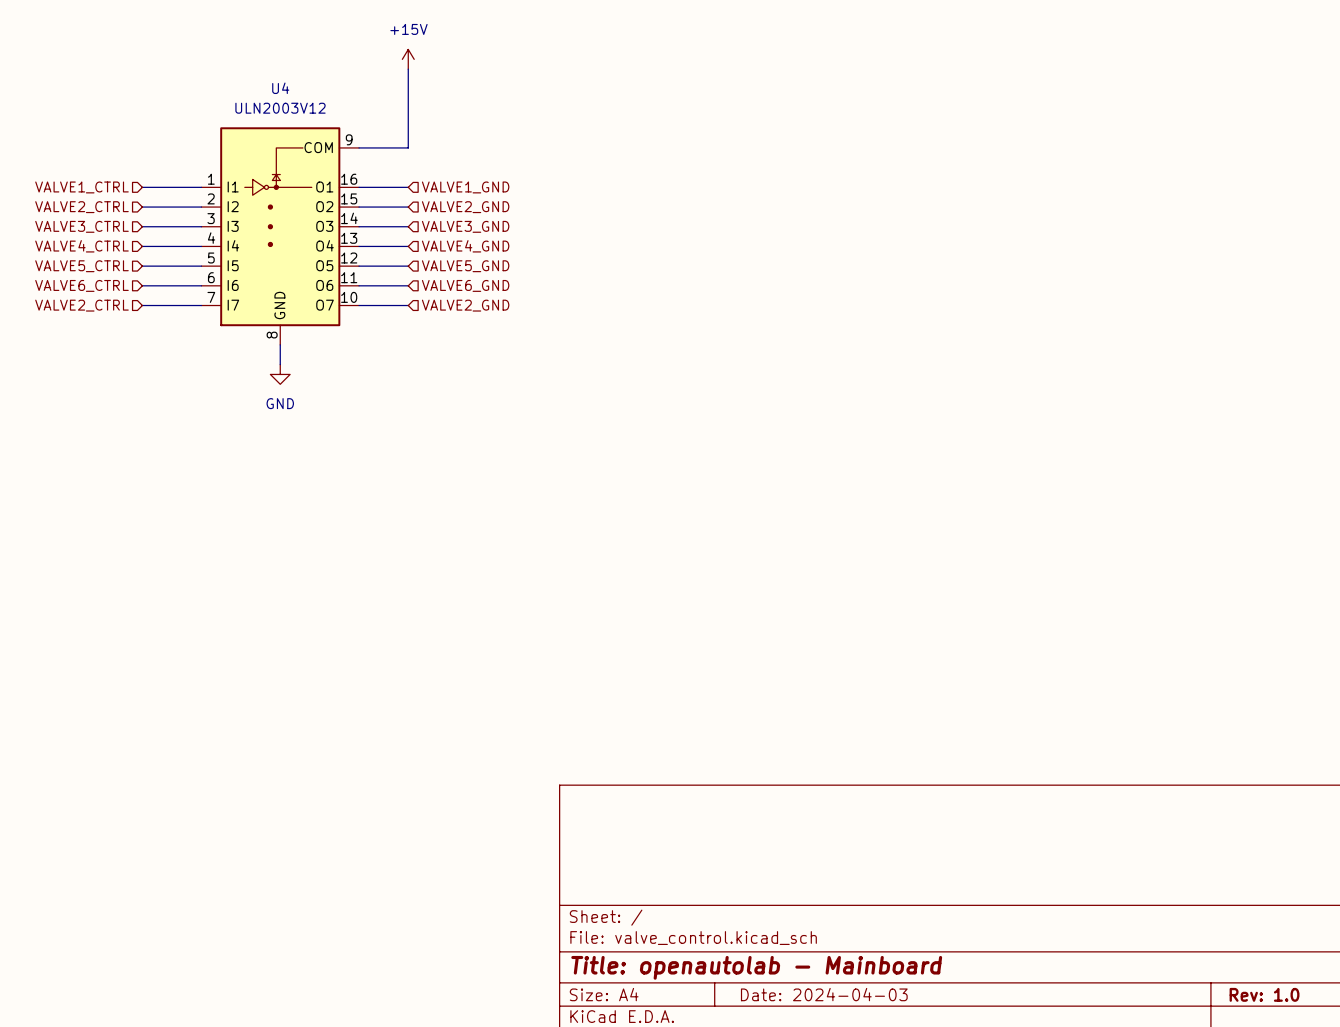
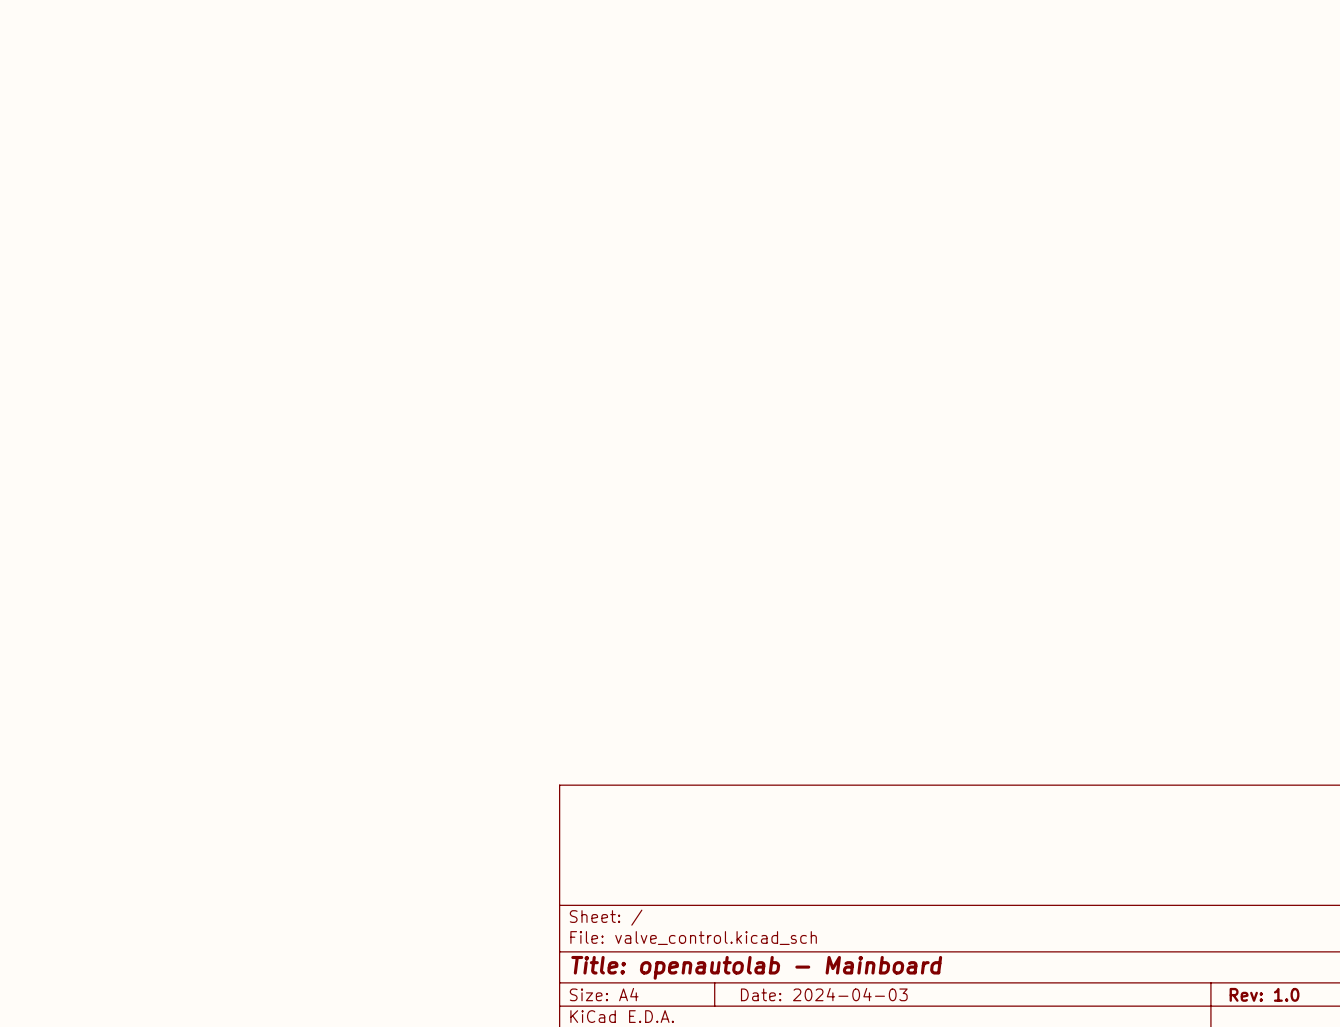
power symbol: +15V (408, 59) -> none
wire: (408, 69) (408, 147) (359, 147) -> none
hierarchical label: VALVE1_CTRL (81, 187) -> none
wire: (142, 187) (201, 187) -> none
wire: (359, 187) (408, 187) -> none
hierarchical label: VALVE1_GND (465, 187) -> none
hierarchical label: VALVE2_CTRL (81, 207) -> none
wire: (142, 207) (201, 207) -> none
wire: (359, 207) (408, 207) -> none
hierarchical label: VALVE2_GND (465, 207) -> none
hierarchical label: VALVE3_CTRL (81, 226) -> none
wire: (142, 226) (201, 226) -> none
wire: (359, 226) (408, 226) -> none
hierarchical label: VALVE3_GND (465, 226) -> none
U4: ULN2003V12 (280, 236) -> none
hierarchical label: VALVE4_CTRL (81, 246) -> none
wire: (142, 246) (201, 246) -> none
wire: (359, 246) (408, 246) -> none
hierarchical label: VALVE4_GND (465, 246) -> none
hierarchical label: VALVE5_CTRL (81, 266) -> none
wire: (142, 266) (201, 266) -> none
wire: (359, 266) (408, 266) -> none
hierarchical label: VALVE5_GND (465, 266) -> none
hierarchical label: VALVE6_CTRL (81, 285) -> none
wire: (142, 285) (201, 285) -> none
wire: (359, 285) (408, 285) -> none
hierarchical label: VALVE6_GND (465, 285) -> none
hierarchical label: VALVE2_CTRL (81, 305) -> none
wire: (142, 305) (201, 305) -> none
wire: (359, 305) (408, 305) -> none
hierarchical label: VALVE2_GND (465, 305) -> none
wire: (280, 344) (280, 364) -> none
power symbol: GND (280, 374) -> none

